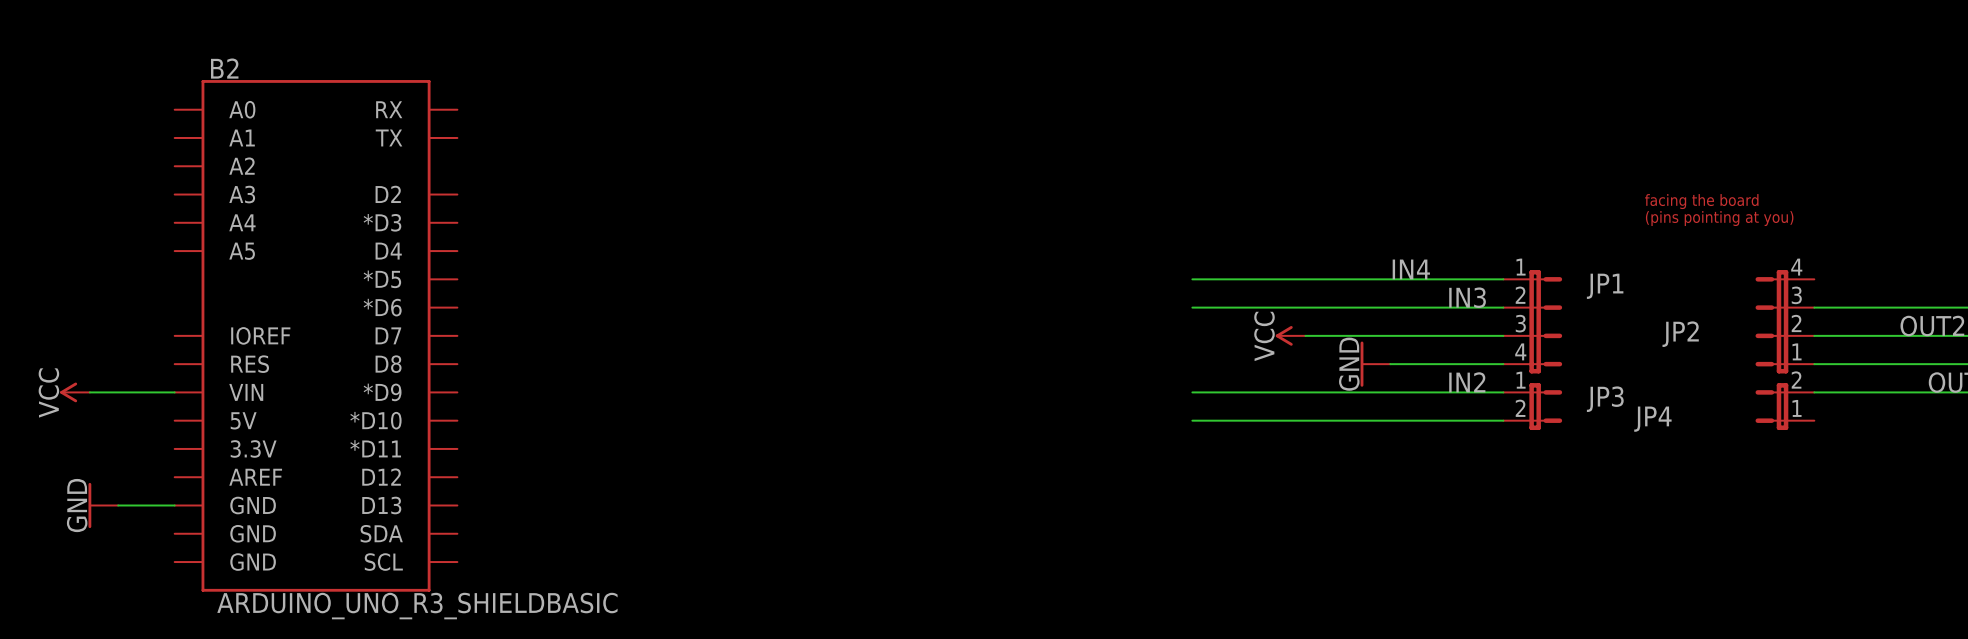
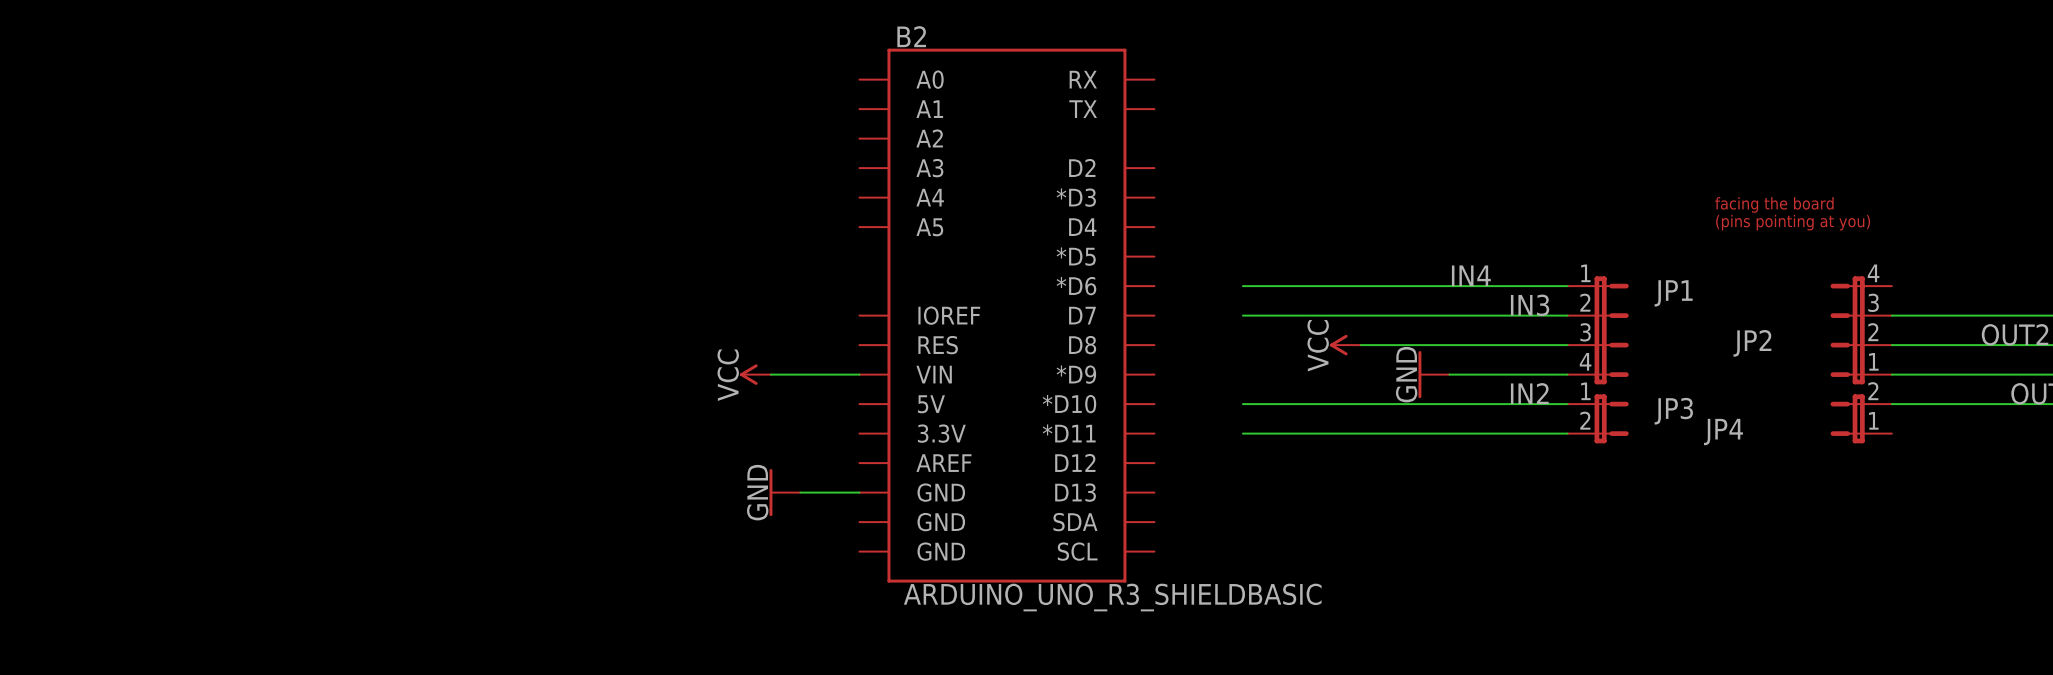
B2 position: (316, 335) -> (1006, 315)
power symbol: none -> VCC (755, 374)
wire: none -> (770, 374) (859, 374)
power symbol: VCC (75, 392) -> none
wire: (89, 392) (174, 392) -> none
power symbol: none -> GND (784, 492)
wire: none -> (800, 492) (859, 492)
power symbol: GND (103, 505) -> none
wire: (118, 505) (174, 505) -> none

